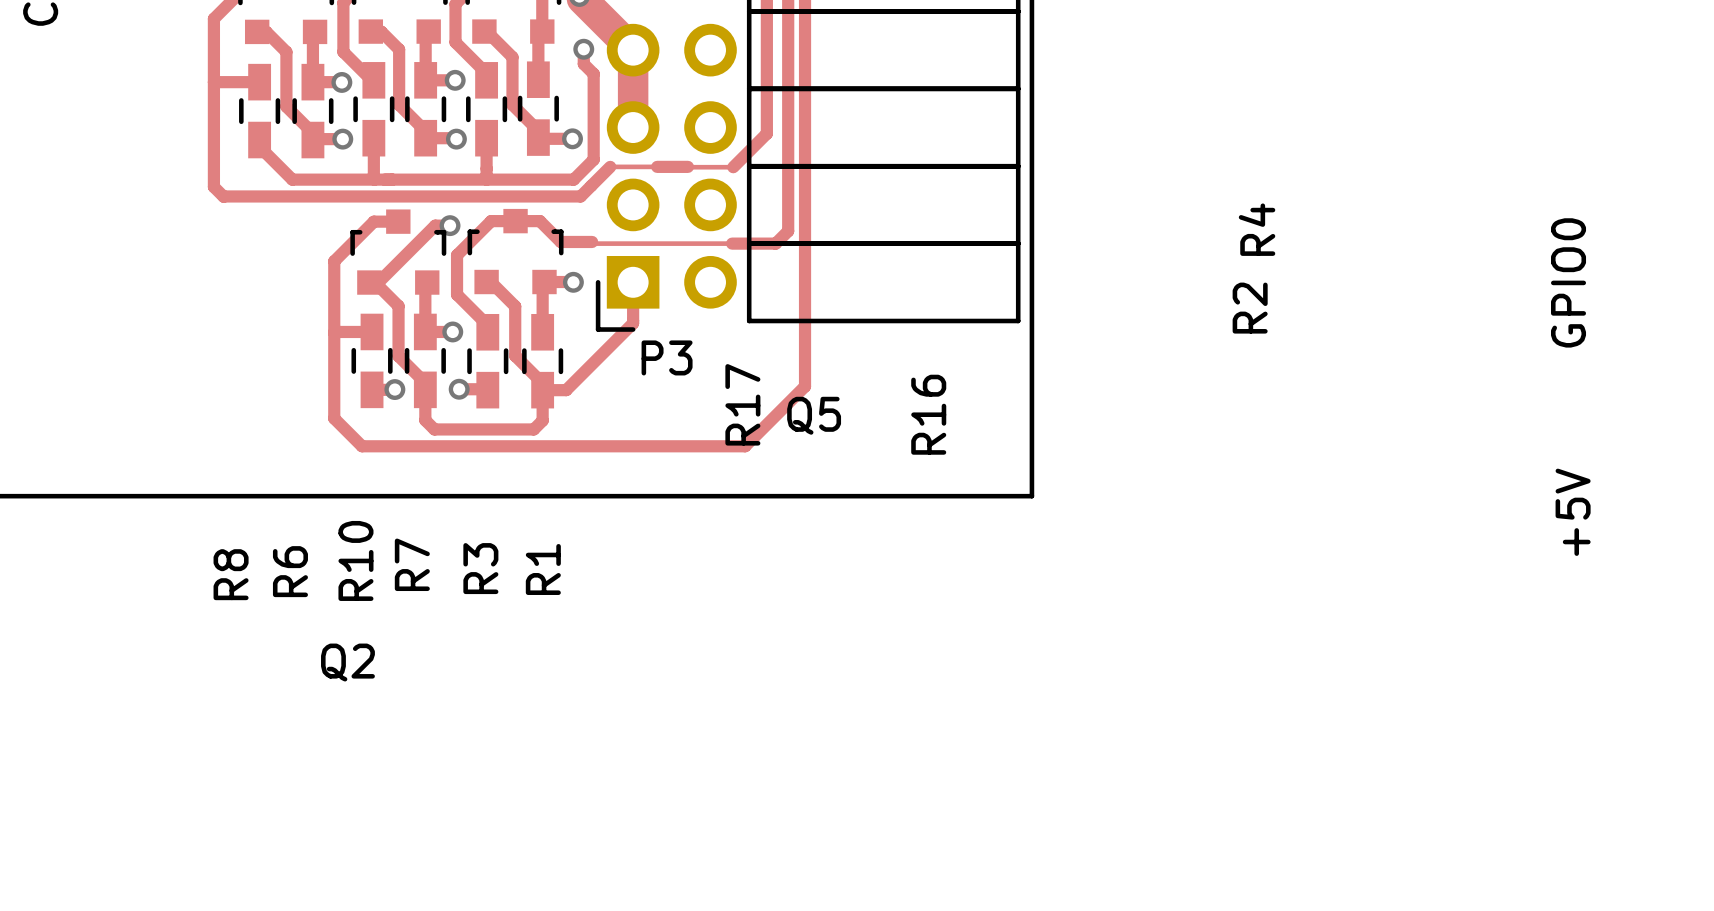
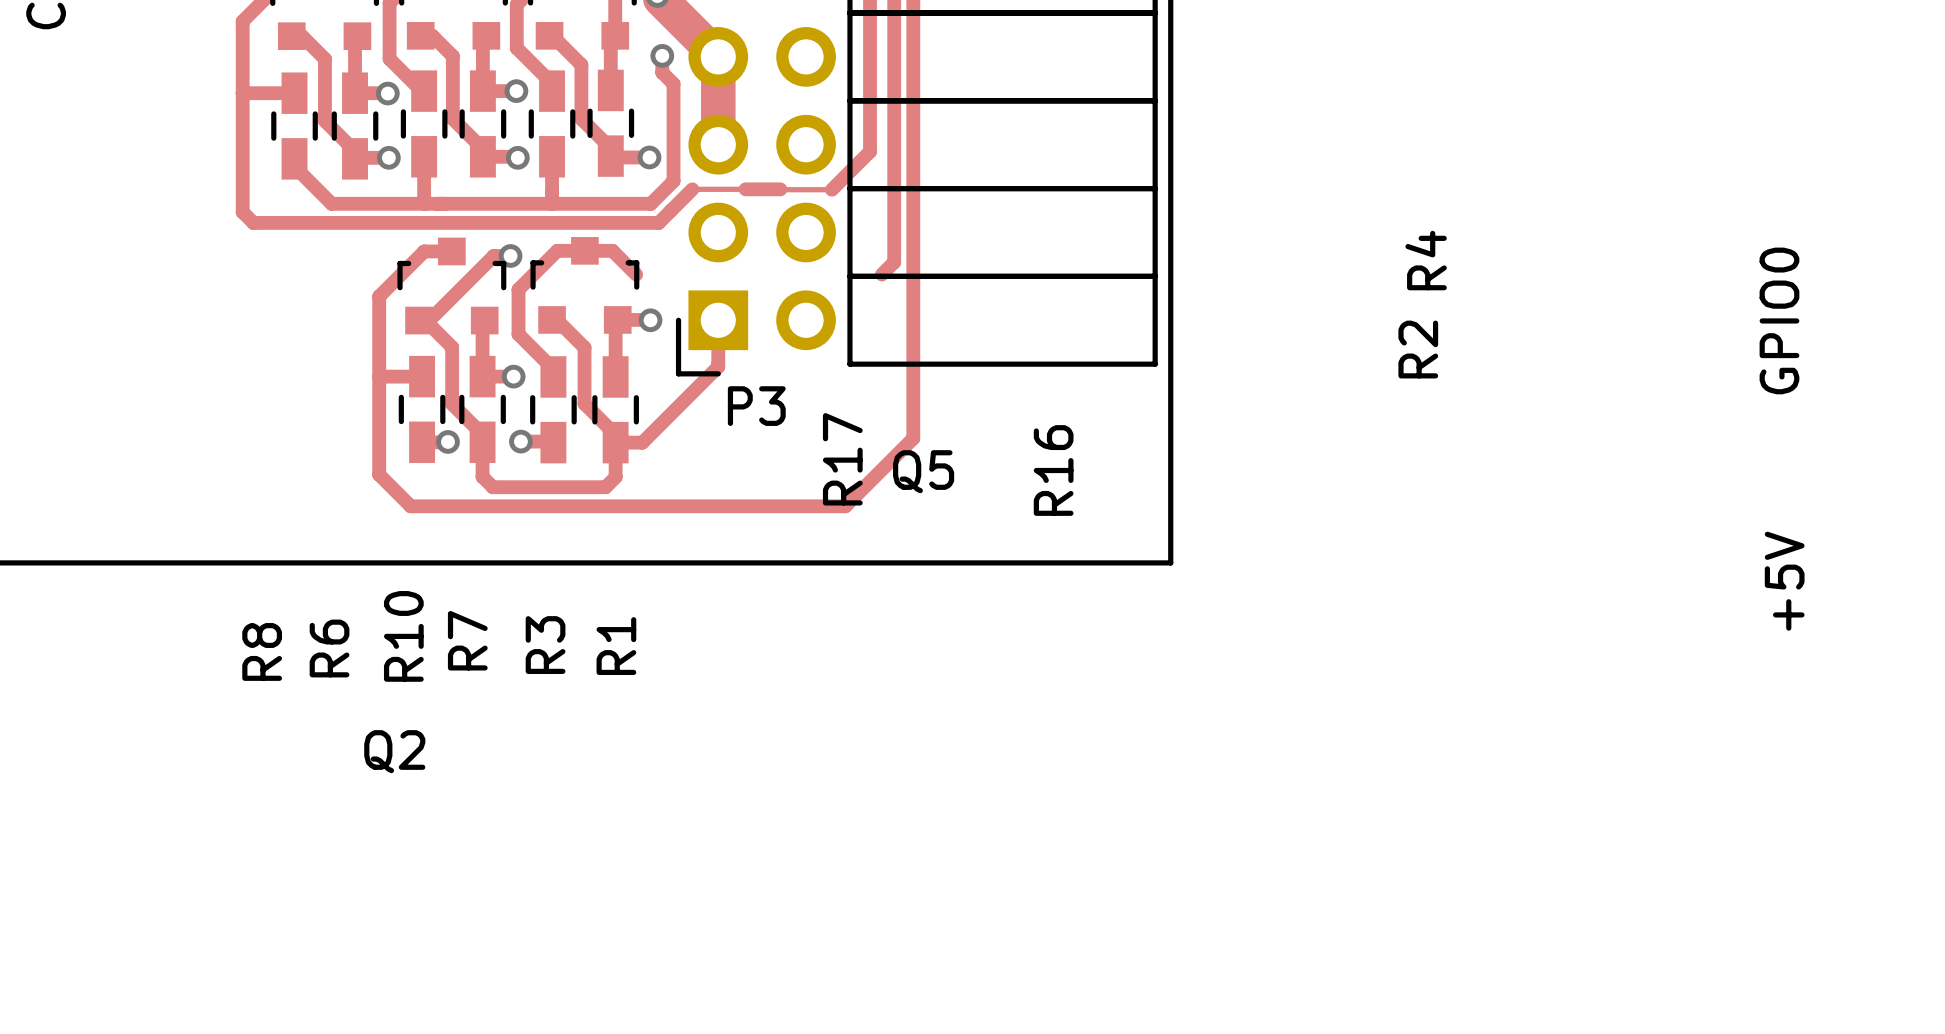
track: (560, 241) (739, 243) -> none
track: (777, 241) (775, 243) (732, 243) -> none

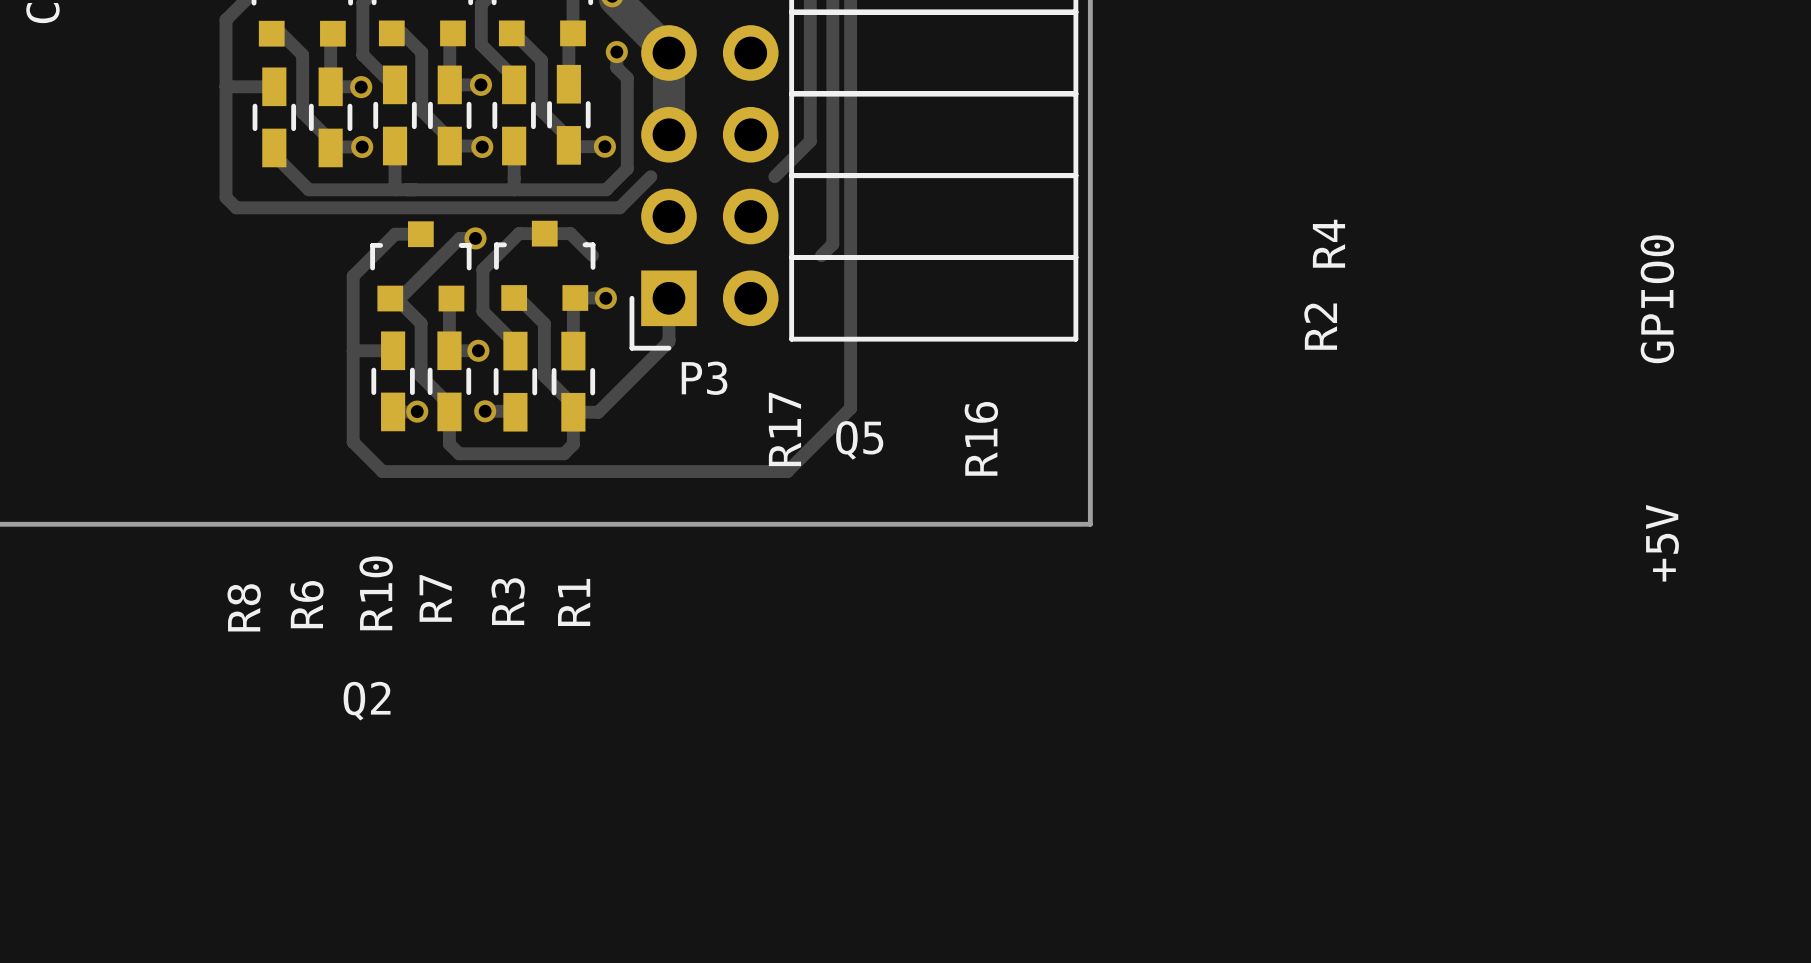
track: (745, 189) (780, 189) -> none
track: (754, 189) (692, 189) (658, 222) (254, 222) -> (650, 176) (619, 207) (236, 207)
track: (780, 189) (831, 189) -> none

